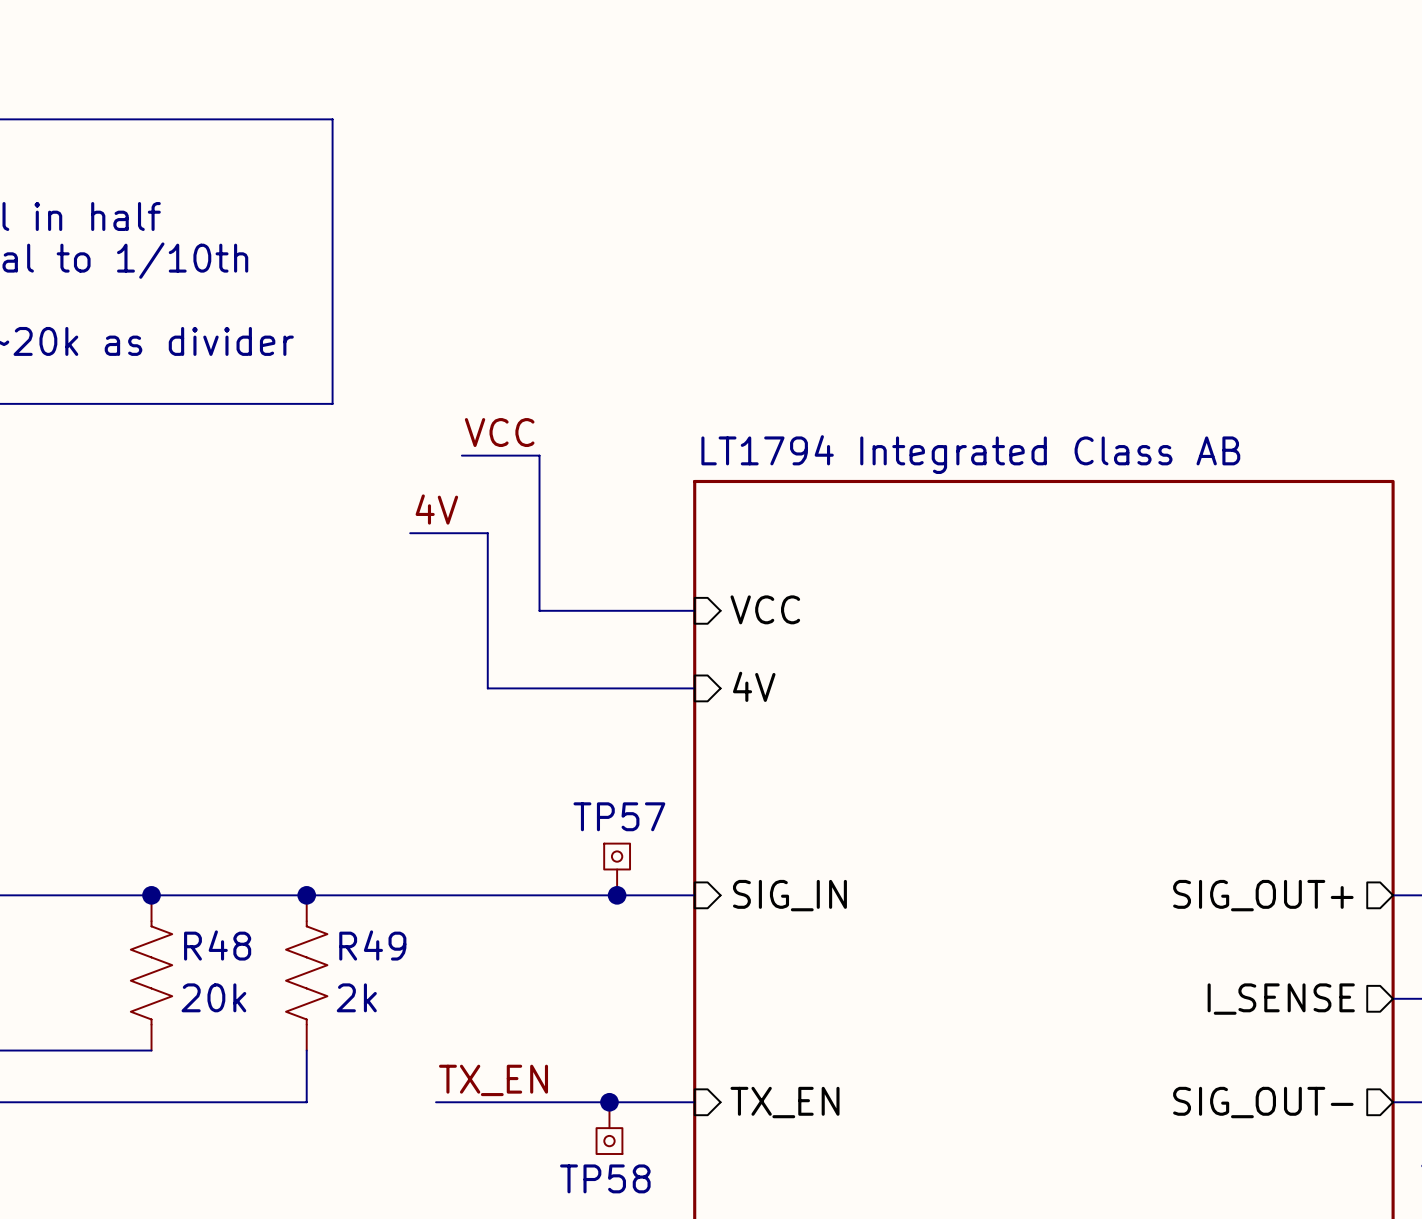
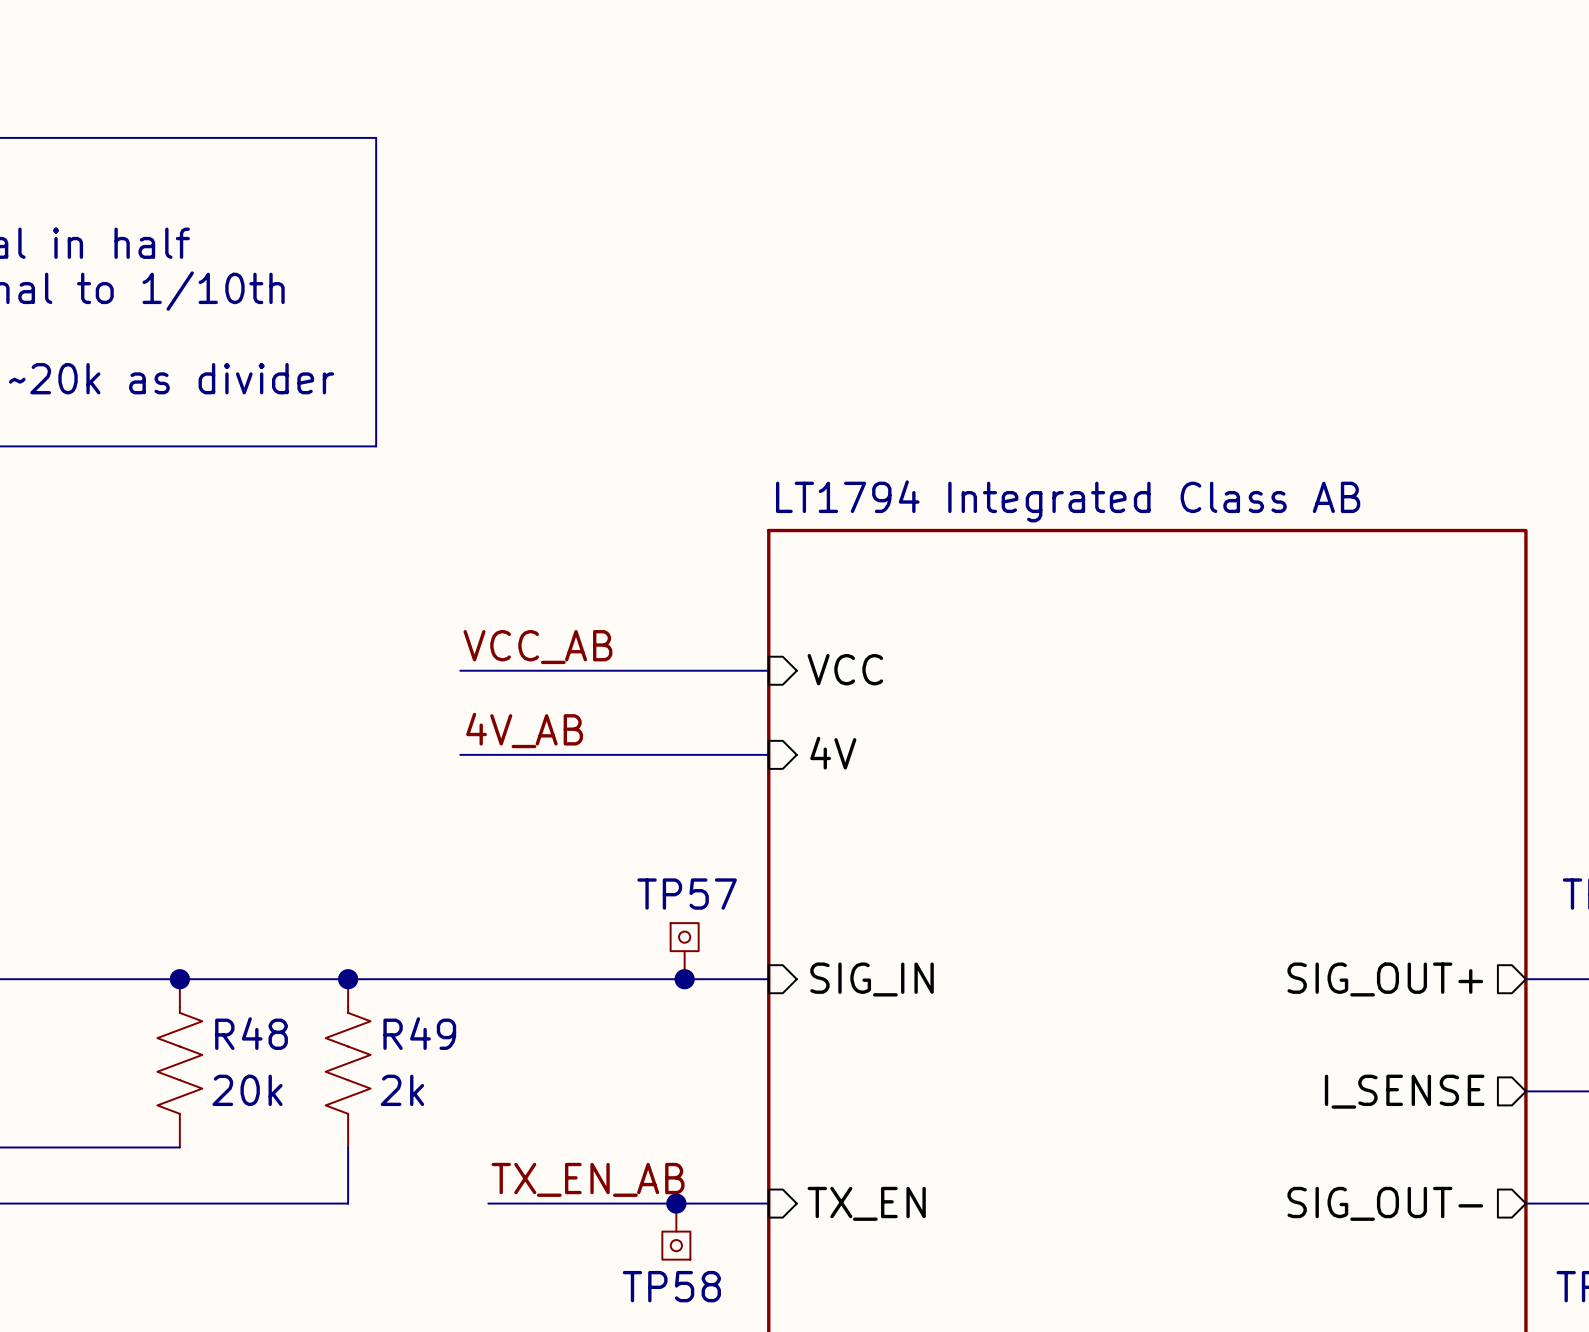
label: VCC (499, 432) -> none
wire: (461, 455) (539, 455) (539, 610) -> (460, 670) (600, 670)
label: 4V (436, 509) -> none
wire: (410, 533) (487, 533) (487, 688) -> (460, 754) (544, 754)
label: none -> VCC_AB (537, 647)
label: none -> 4V_AB (524, 730)
label: TX_EN (493, 1080) -> TX_EN_AB (588, 1179)

